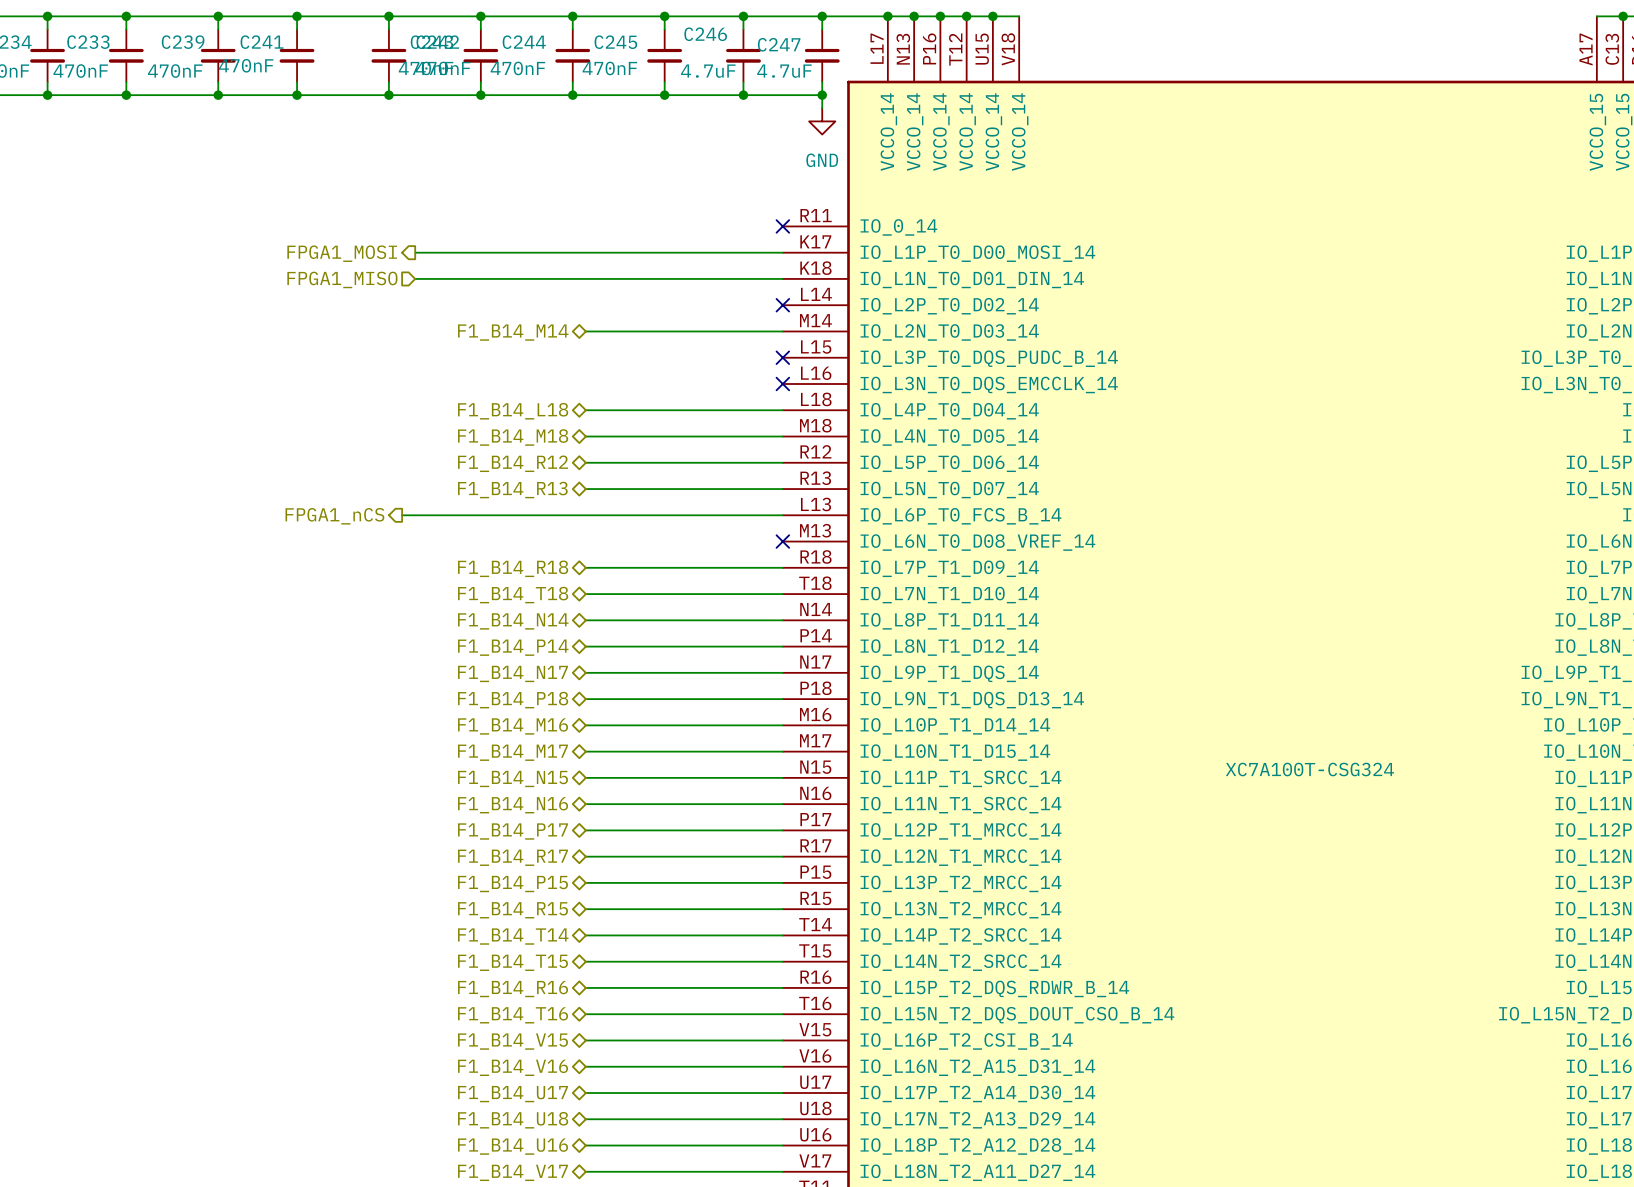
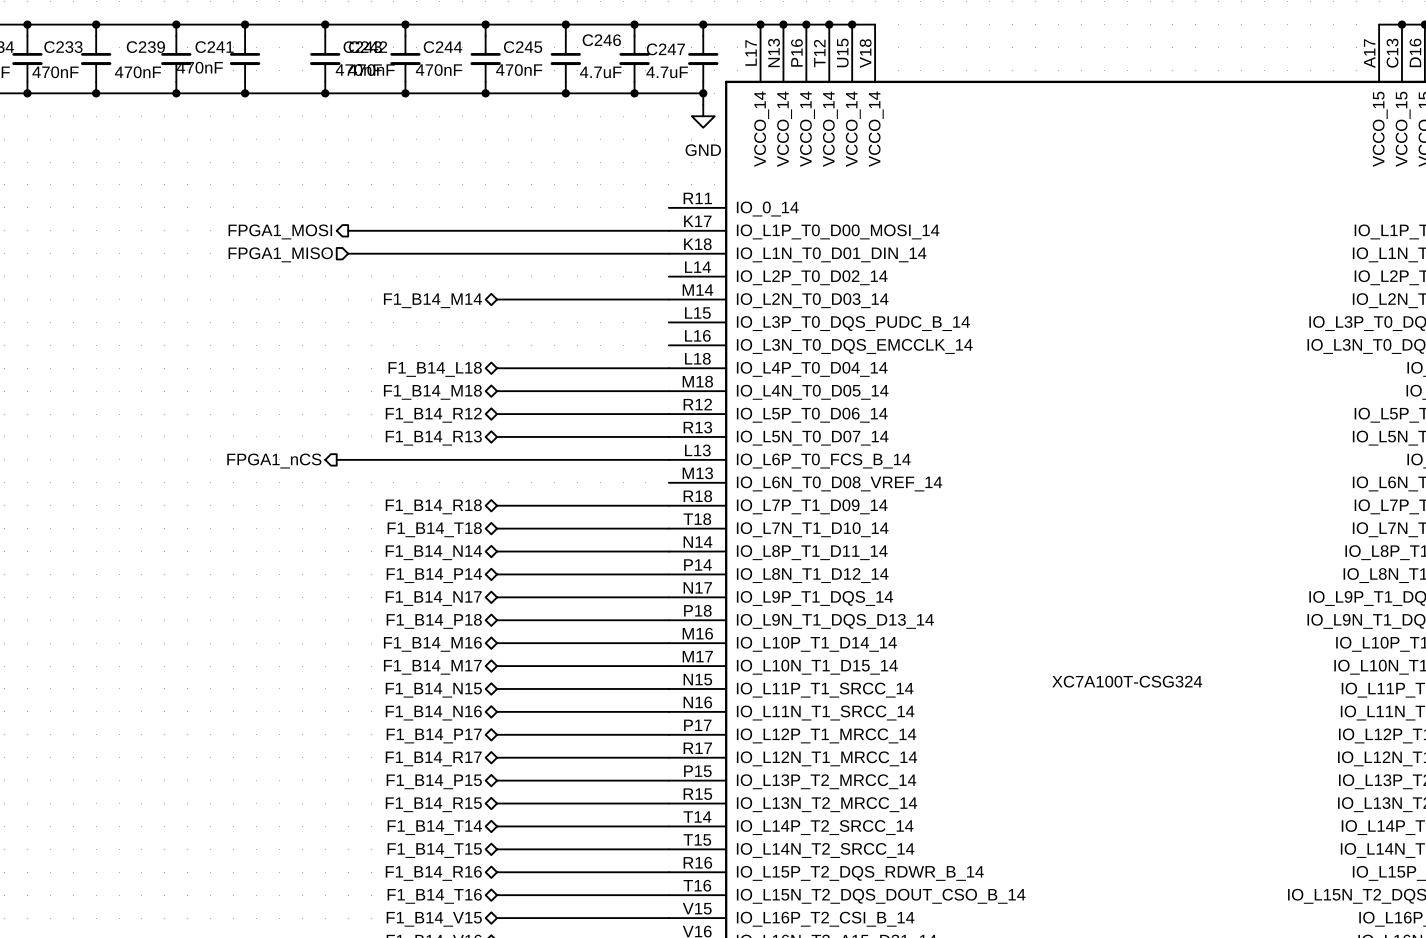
no-connect mark: (782, 226) -> none
no-connect mark: (782, 305) -> none
no-connect mark: (782, 357) -> none
no-connect mark: (782, 383) -> none
no-connect mark: (782, 541) -> none

